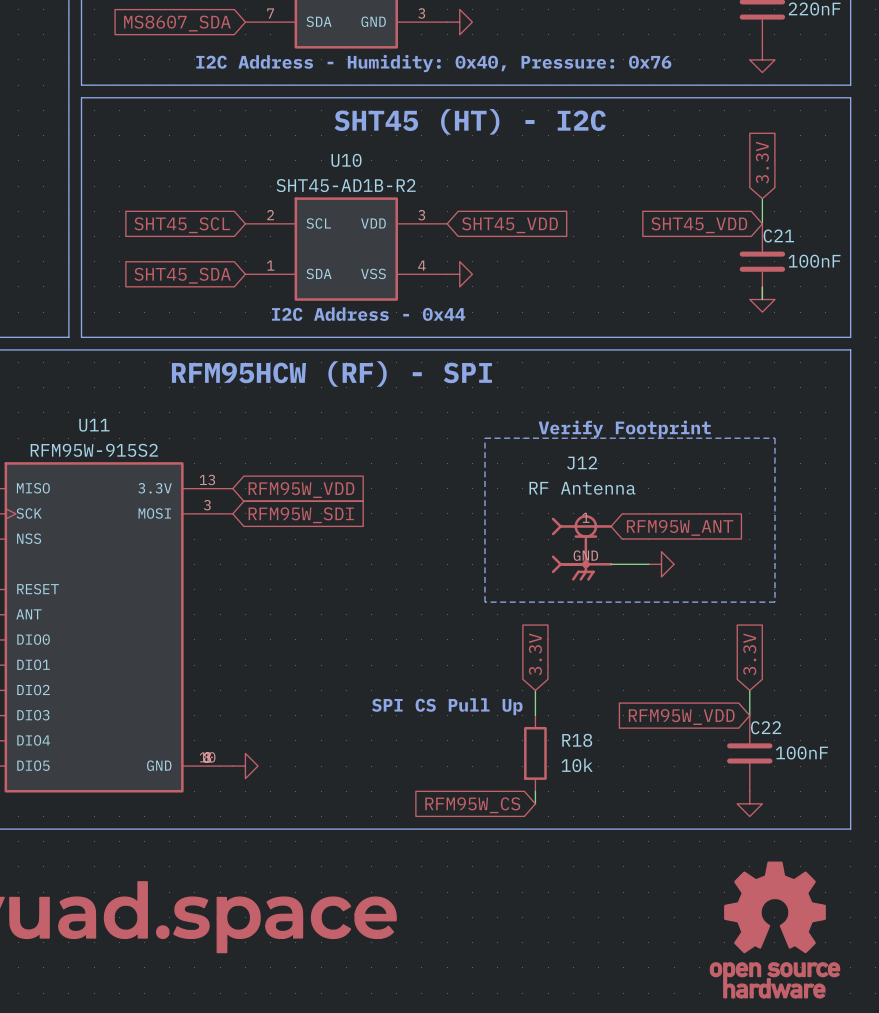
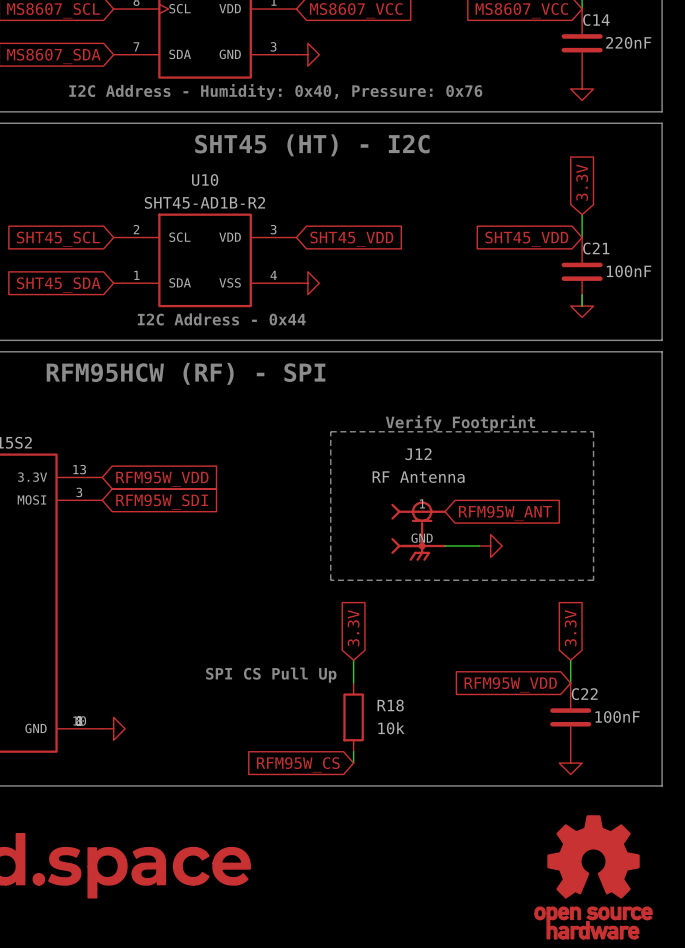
global label position: 3.3V (535, 654) -> 3.3V (353, 628)
wire: (535, 690) (535, 715) -> (353, 660) (353, 683)
text position: SPI CS Pull Up (447, 706) -> SPI CS Pull Up (271, 675)
R18 position: (535, 753) -> (353, 717)
wire: (535, 791) (535, 803) -> (353, 751) (353, 763)
global label position: RFM95W_CS (472, 805) -> RFM95W_CS (298, 764)

